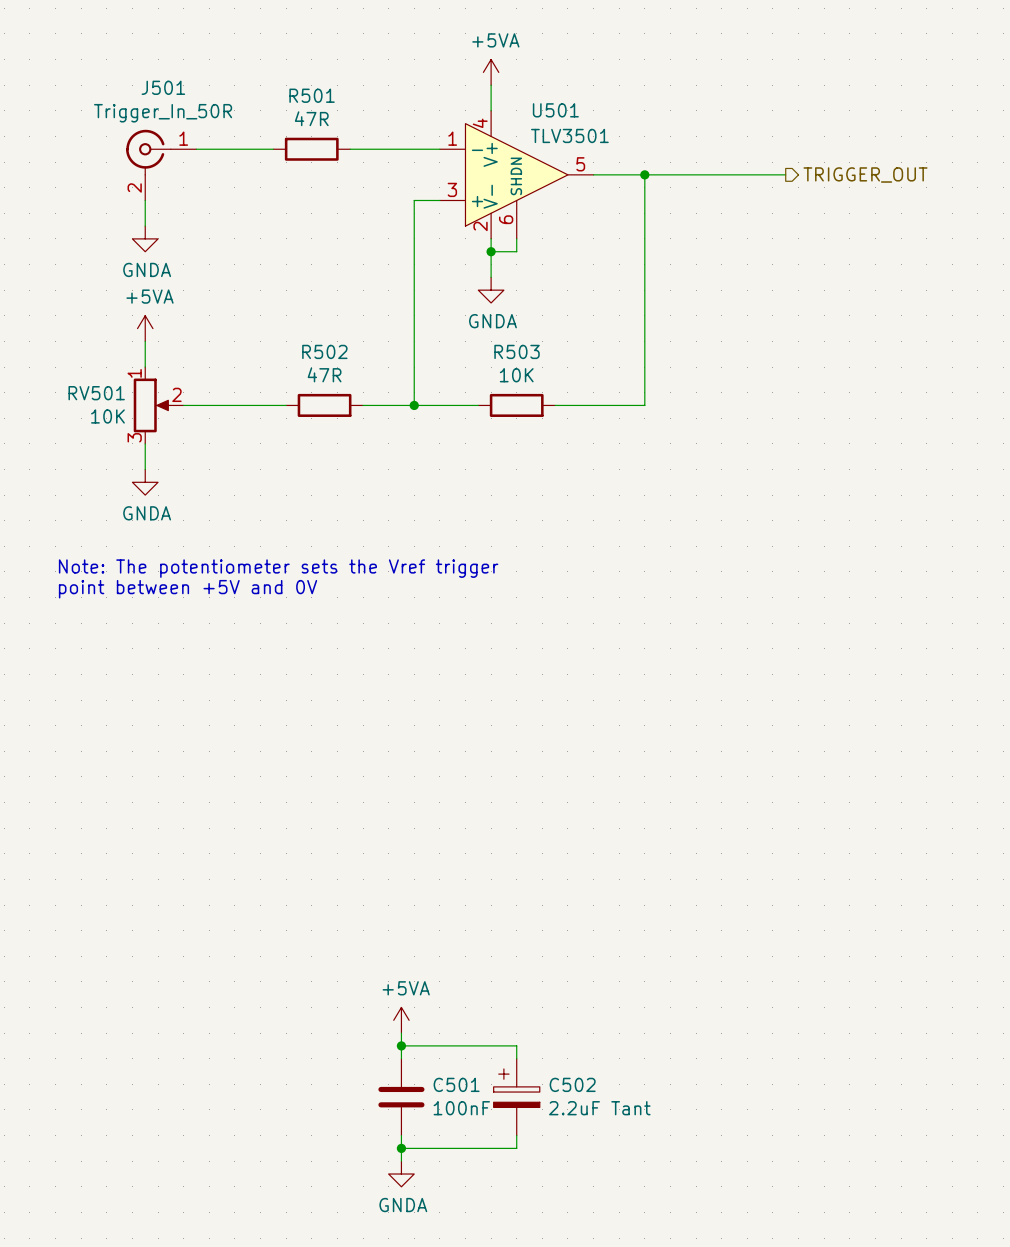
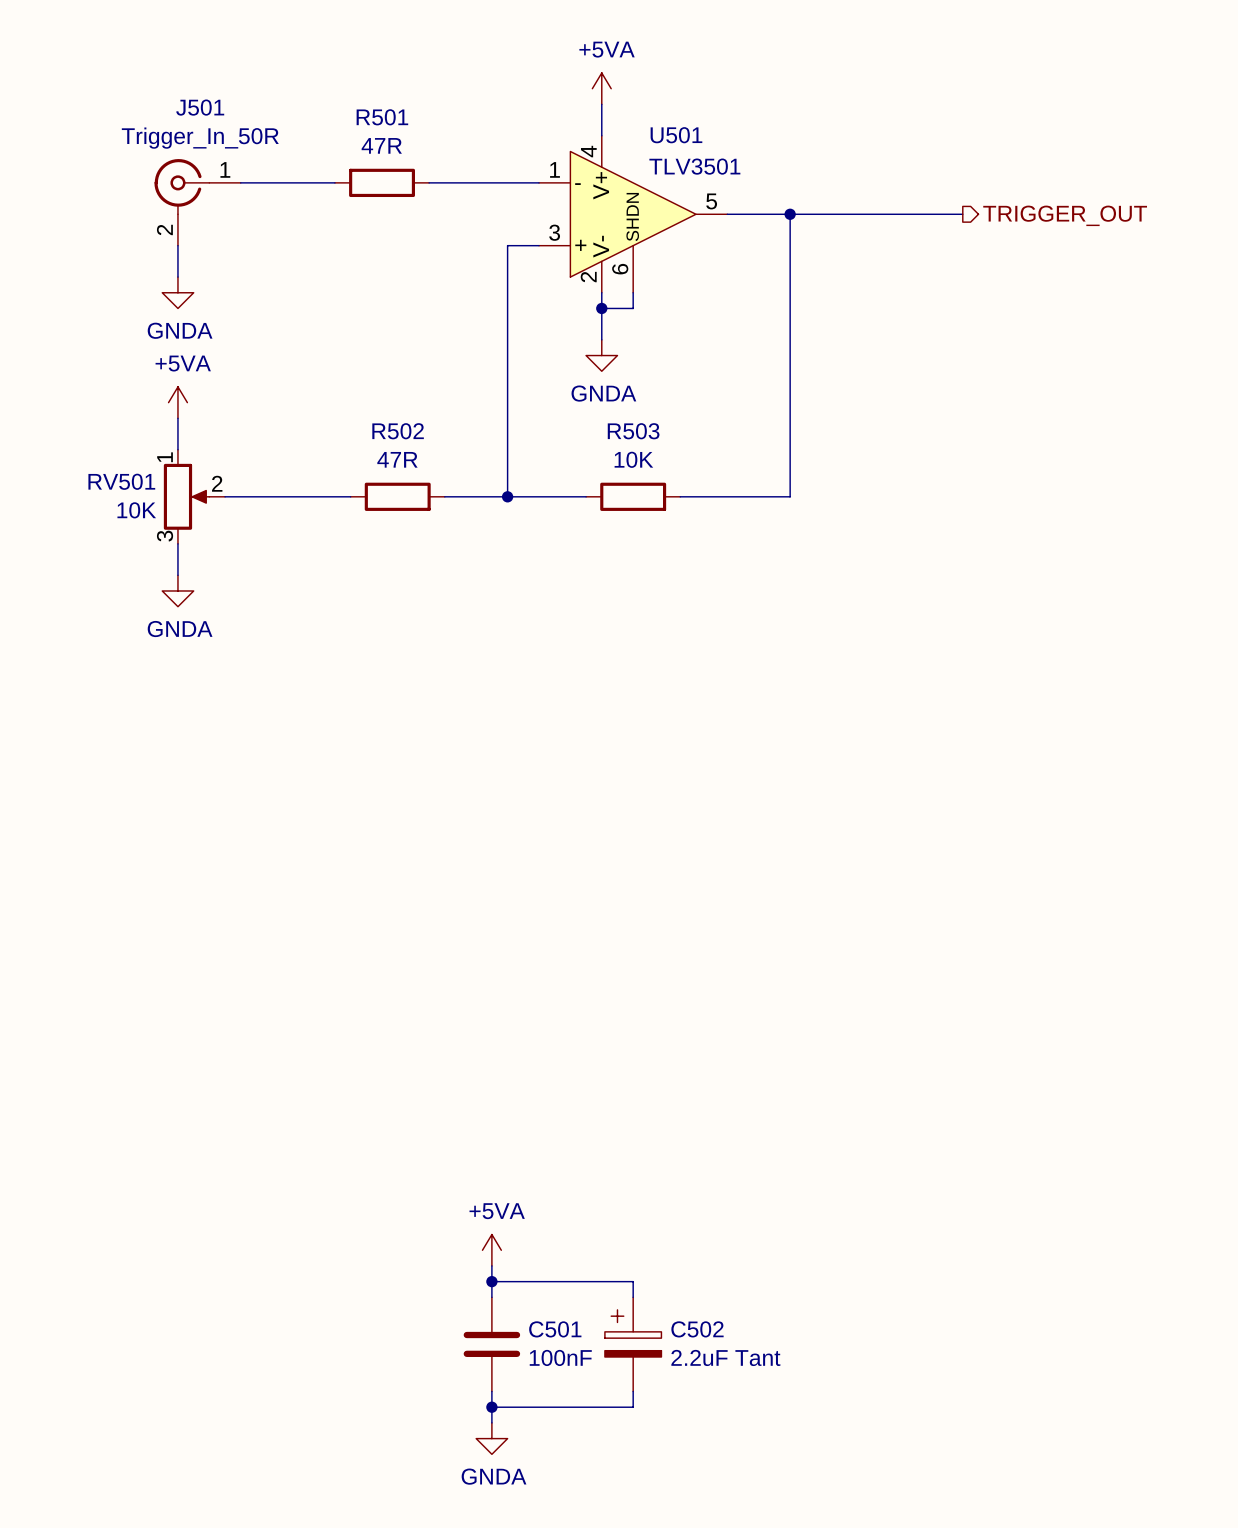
text: Note: The potentiometer sets the Vref trigger (278, 568) -> none
text: point between +5V and 0V (188, 589) -> none

